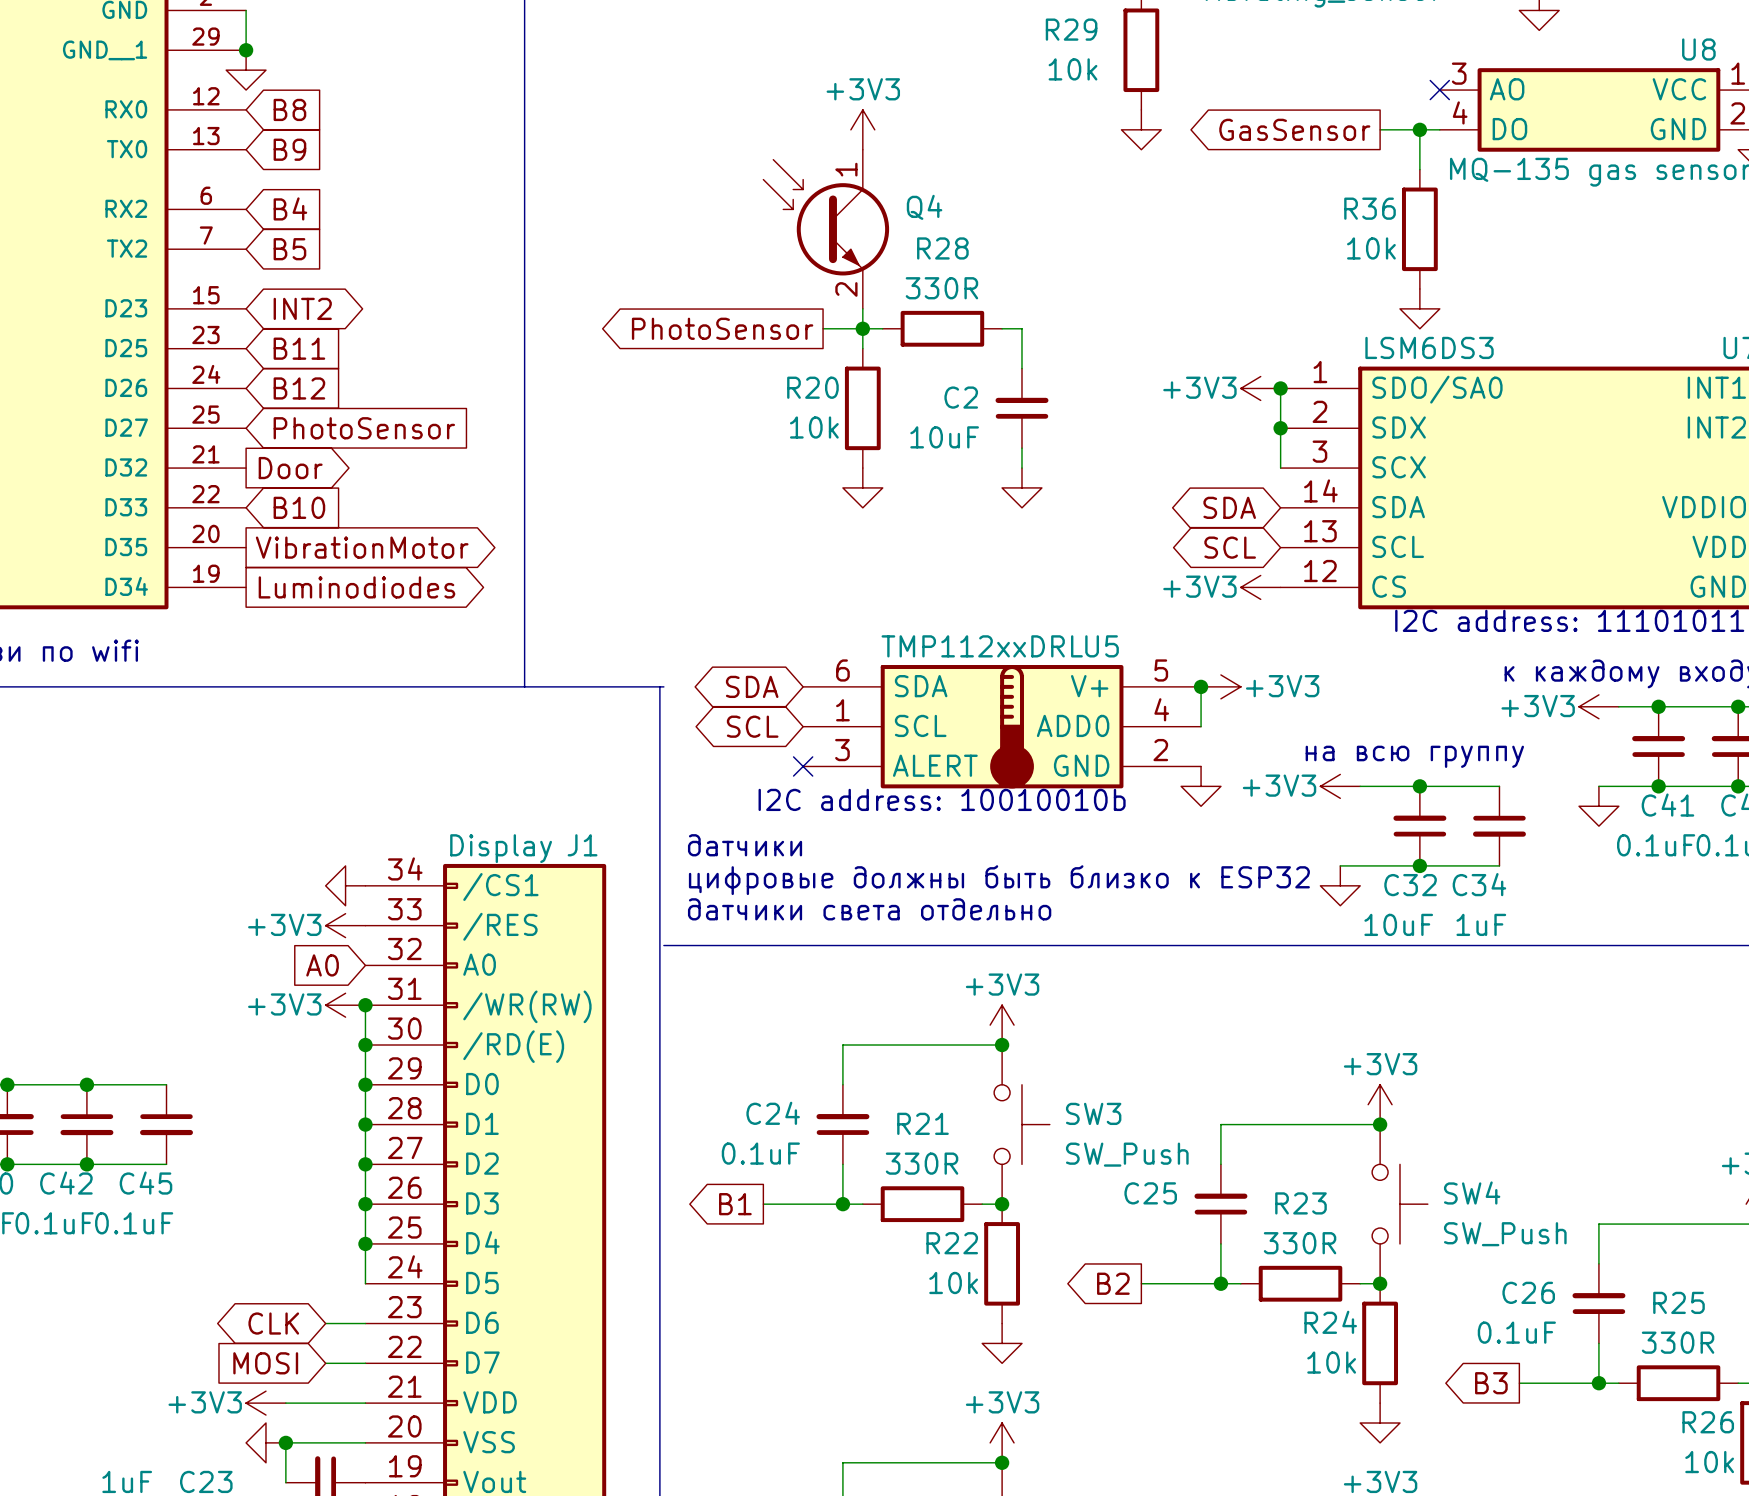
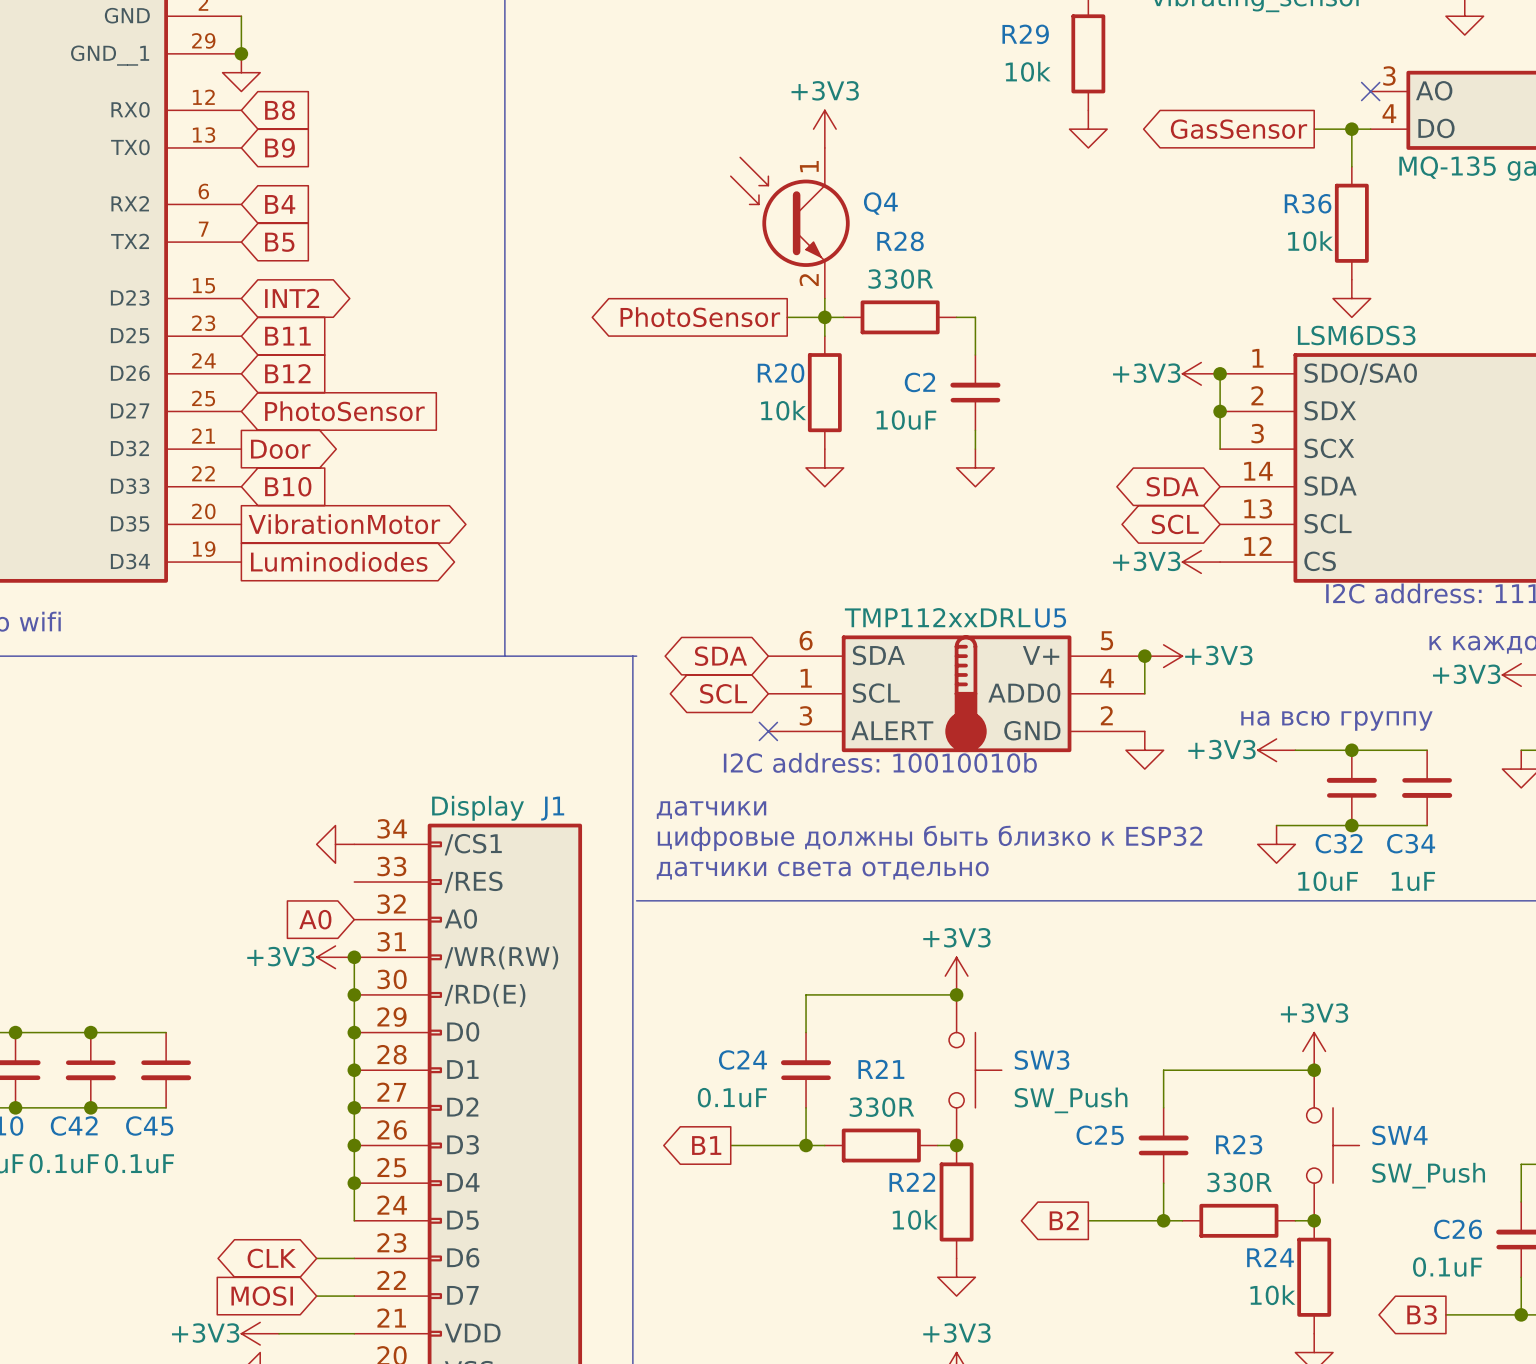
power symbol: +3V3 (345, 925) -> none

